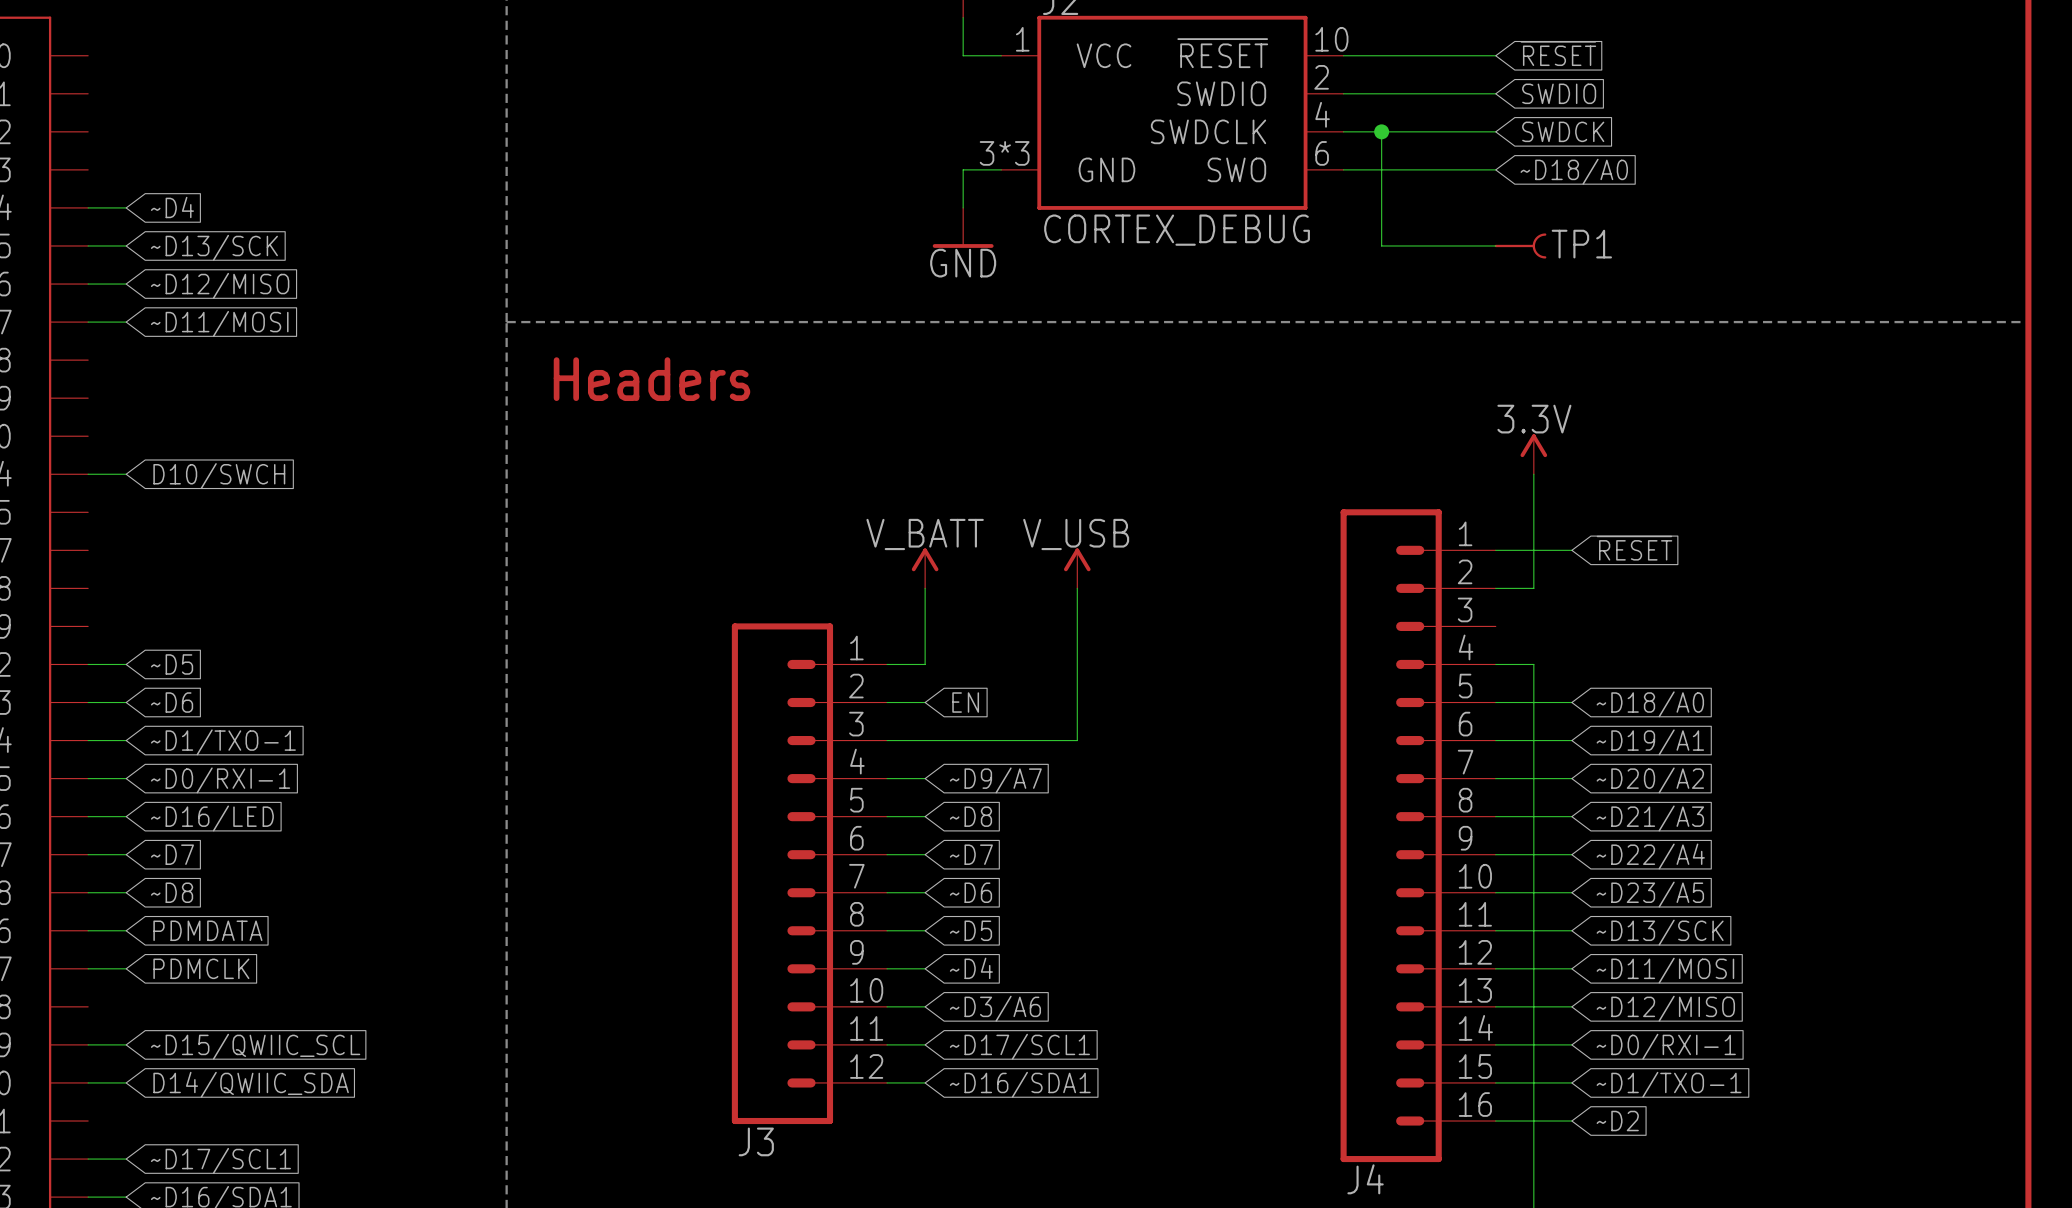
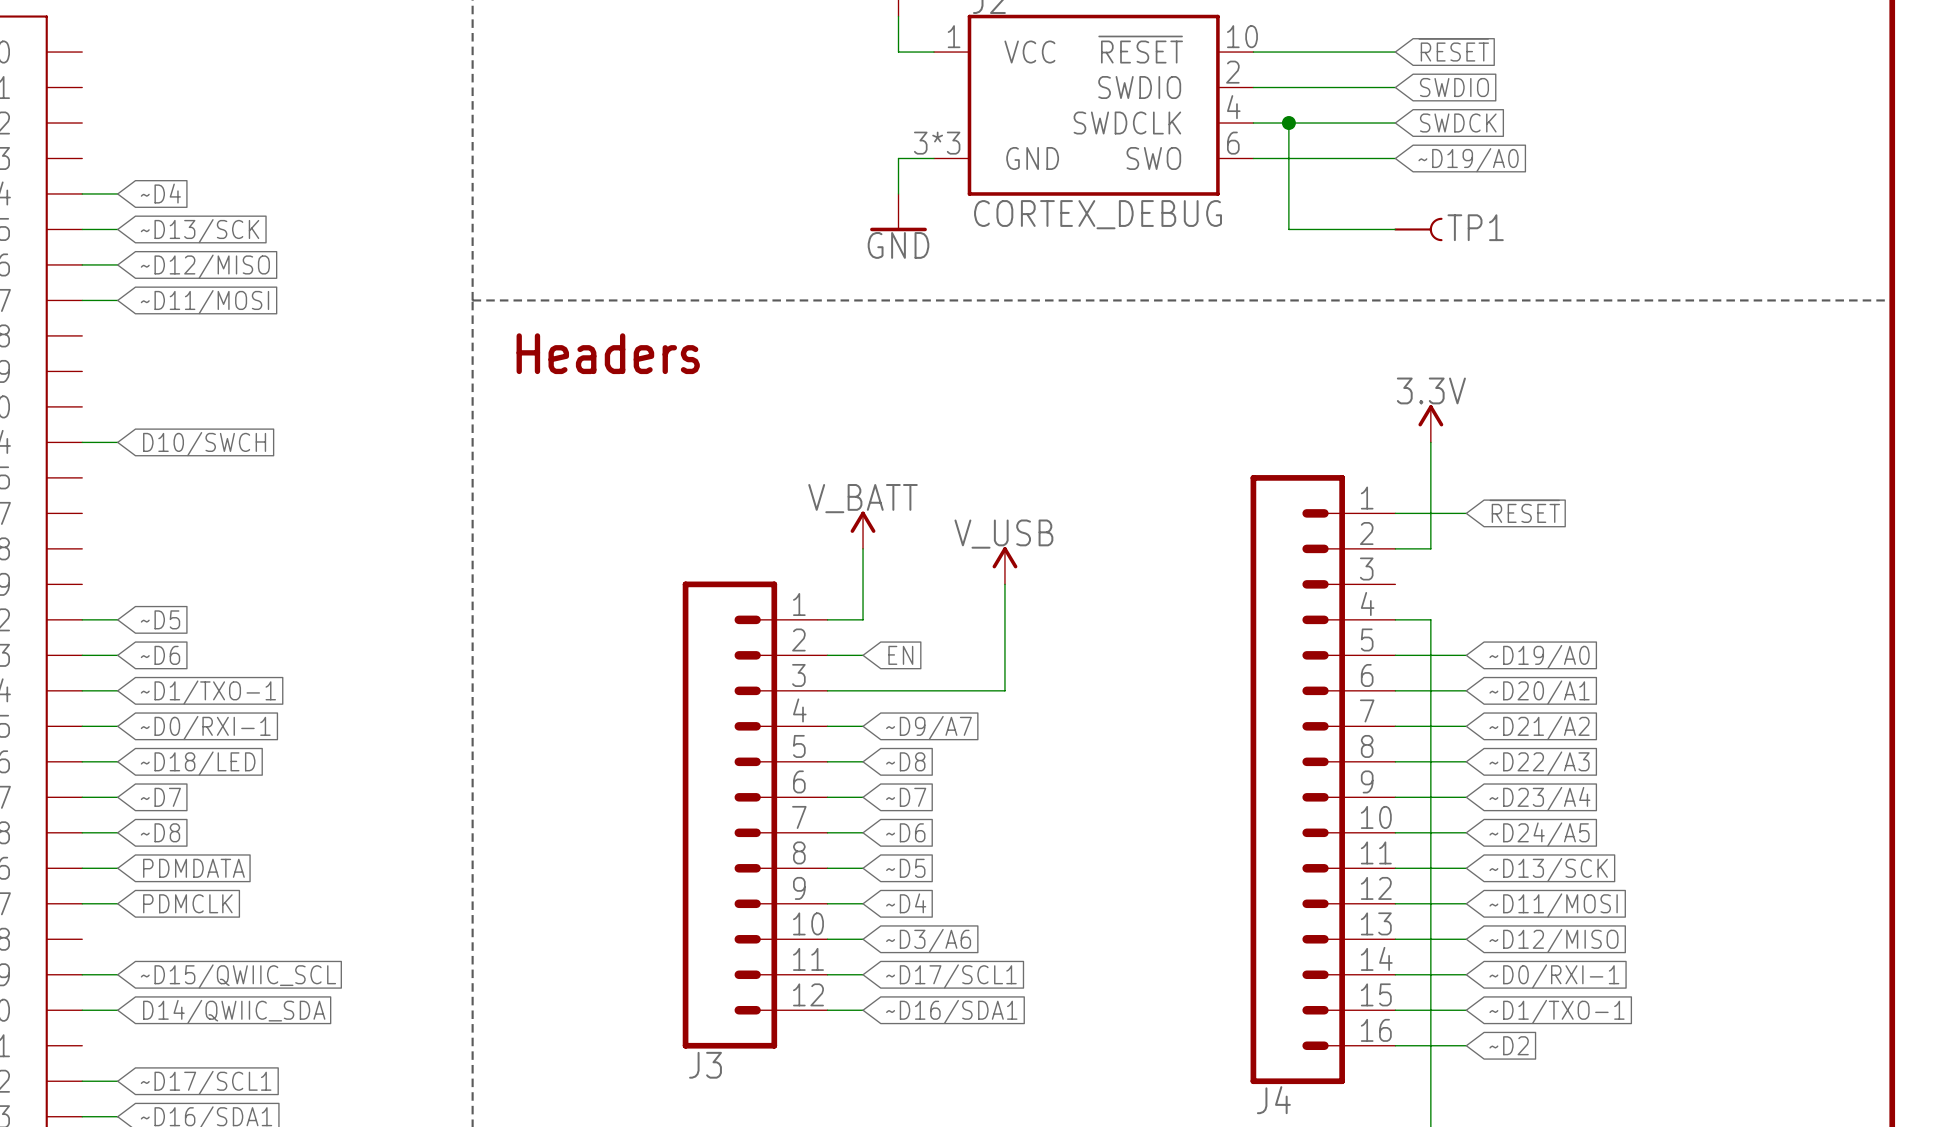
global label: ~D18/A0 (1574, 171) -> ~D19/A0 (1468, 160)
power symbol position: V_USB (1077, 568) -> V_USB (1004, 565)
global label: ~D18/A0 (1650, 704) -> ~D19/A0 (1539, 657)
global label: ~D19/A1 (1650, 742) -> ~D20/A1 (1539, 692)
global label: ~D20/A2 (1650, 780) -> ~D21/A2 (1539, 728)
global label: ~D16/LED (212, 818) -> ~D18/LED (198, 763)
global label: ~D21/A3 (1650, 818) -> ~D22/A3 (1539, 763)
global label: ~D22/A4 (1650, 856) -> ~D23/A4 (1539, 799)
global label: ~D23/A5 (1650, 894) -> ~D24/A5 (1539, 834)

